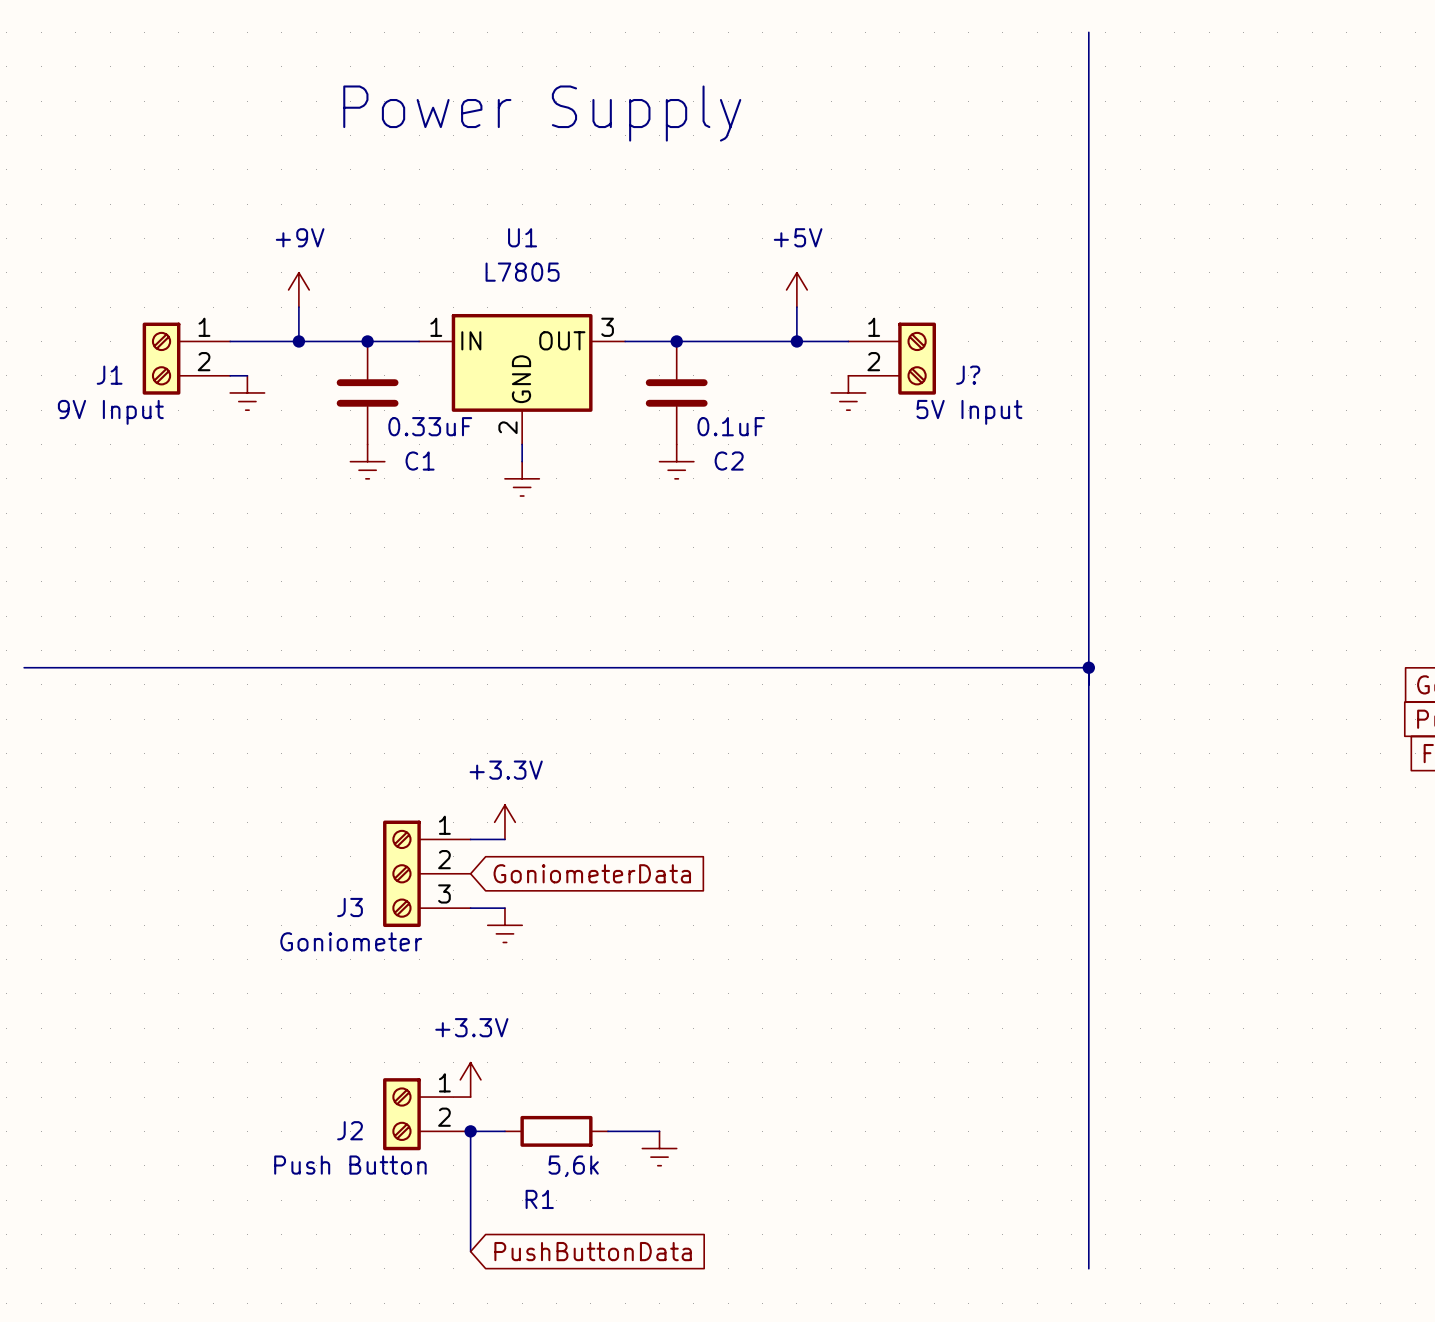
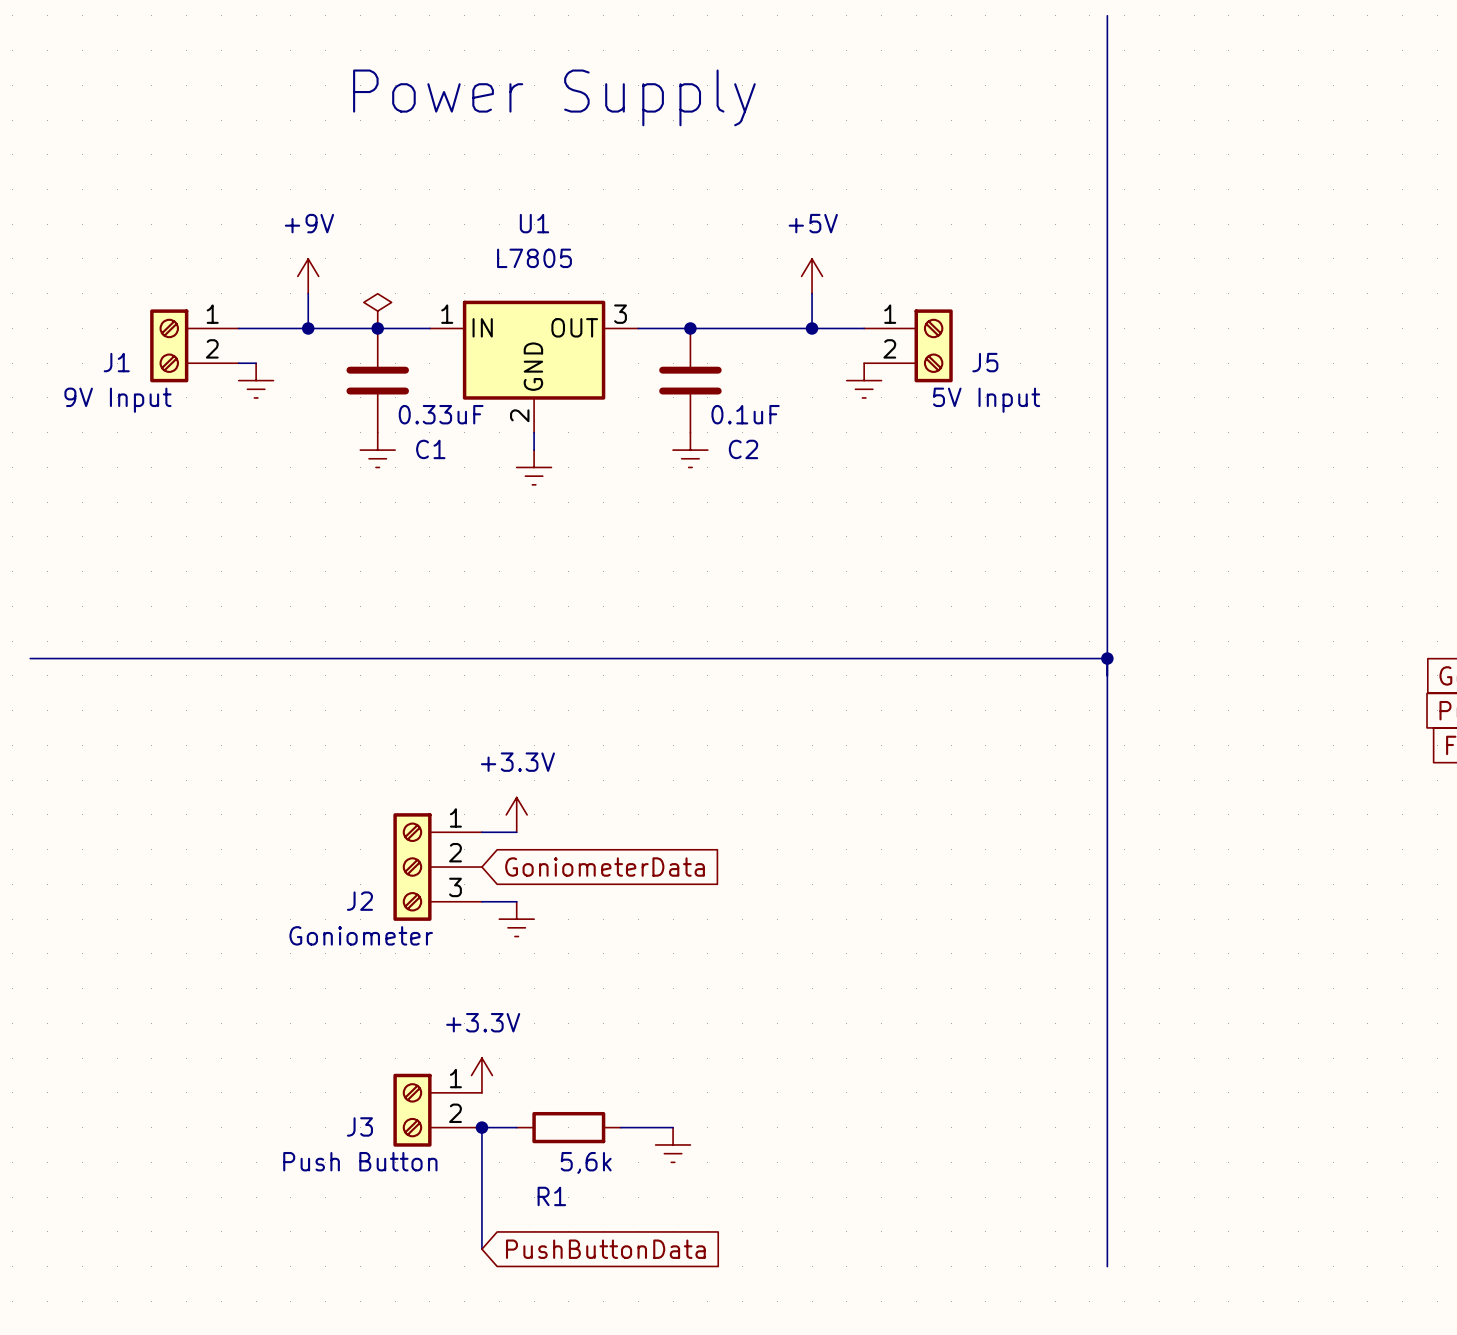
power symbol: none -> (377, 311)
J? name: J? (968, 375) -> J5 (985, 362)
J3 name: J3 (350, 907) -> J2 (359, 901)
J2 name: J2 (350, 1130) -> J3 (359, 1126)

